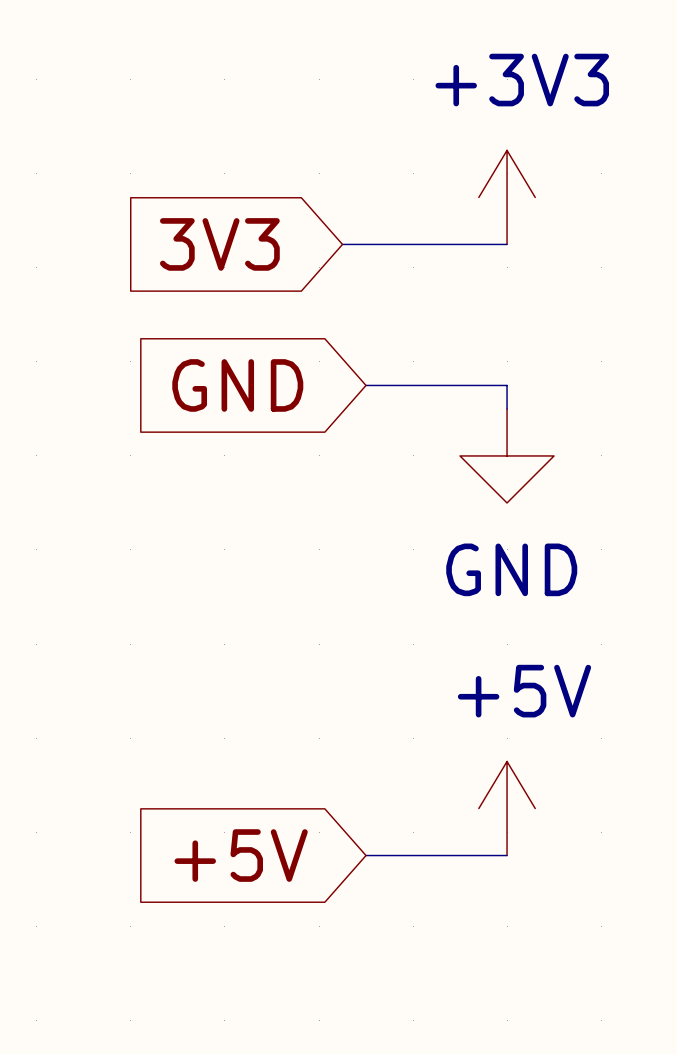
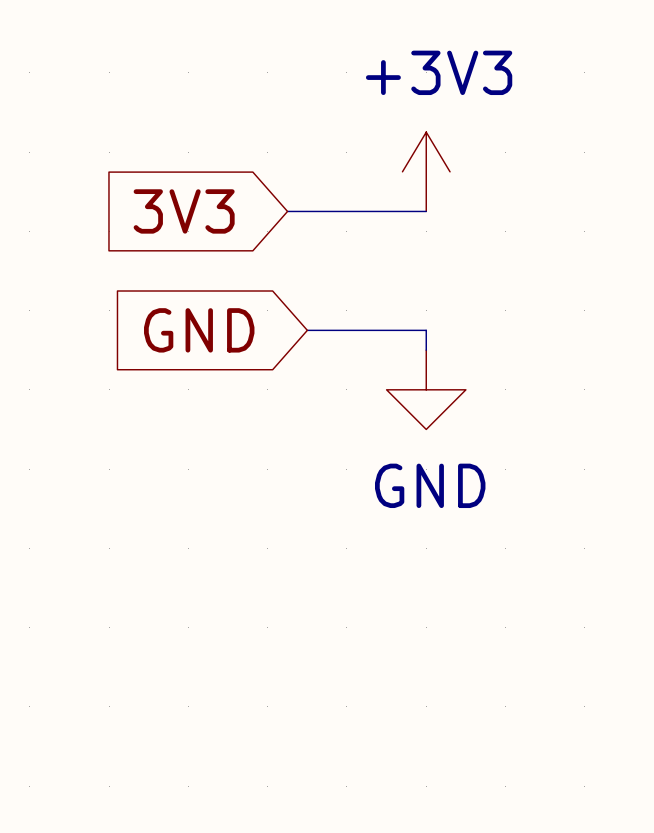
power symbol: +5V (507, 808) -> none
global label: +5V (241, 855) -> none
wire: (366, 855) (507, 855) -> none

